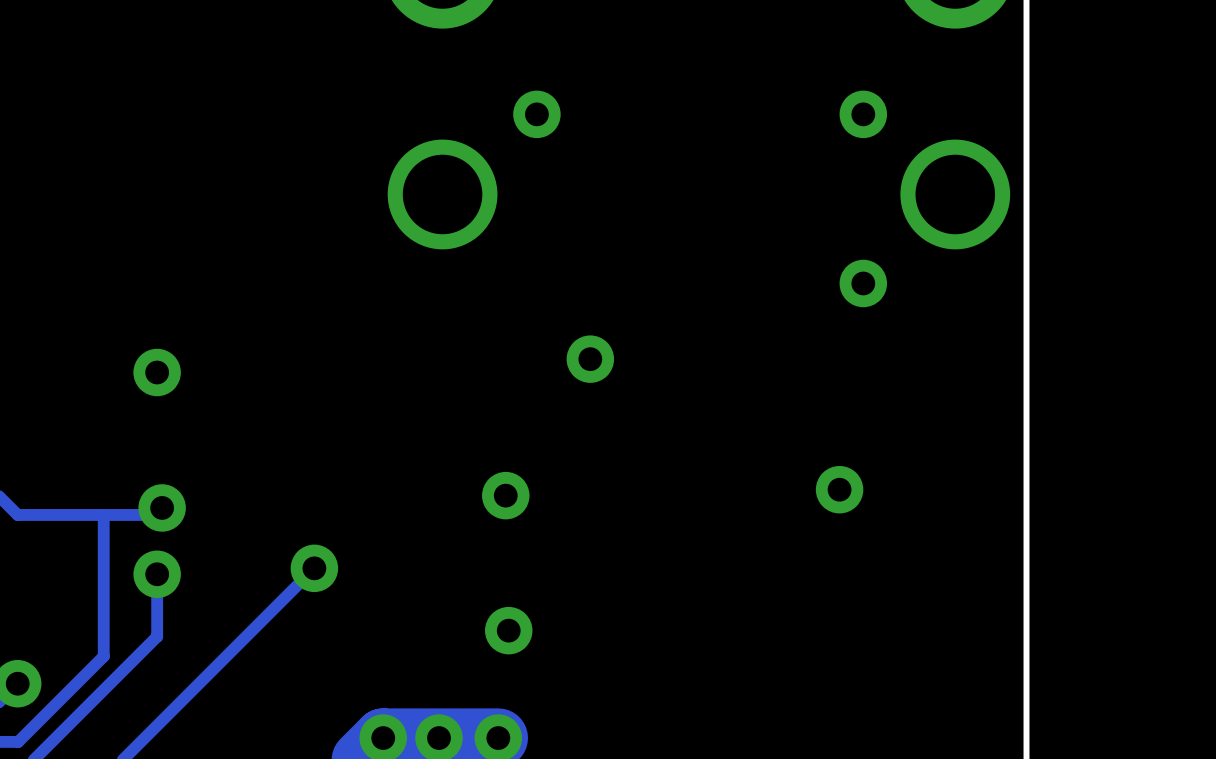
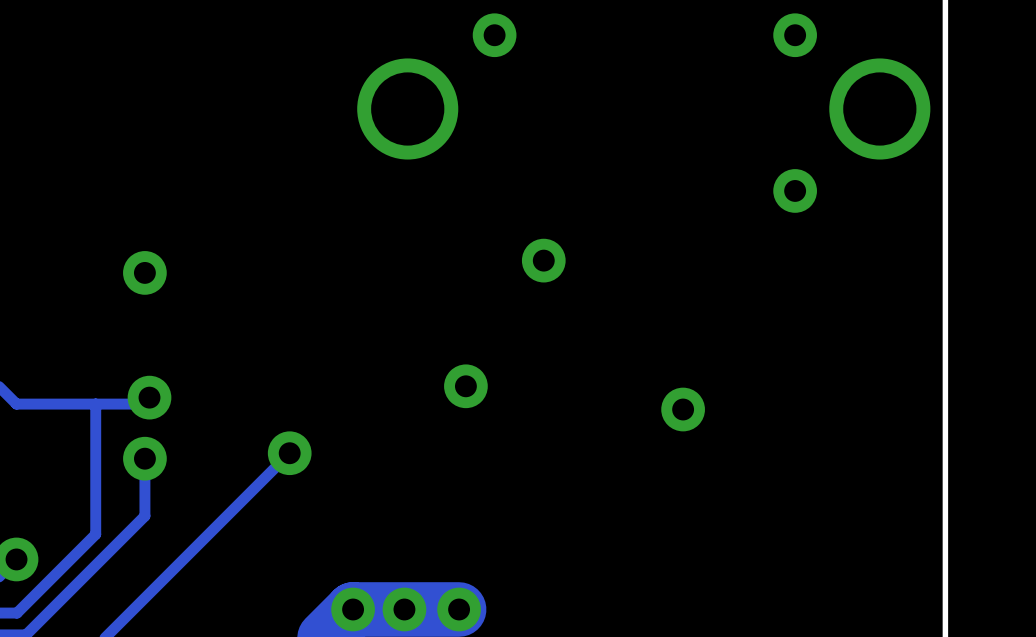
via position: (839, 489) -> (683, 409)
via: (508, 630) -> none

